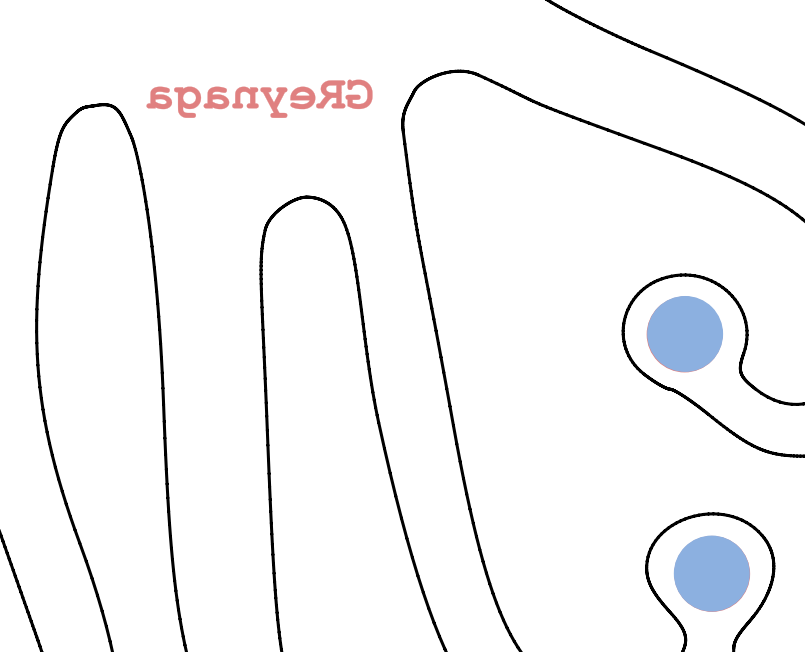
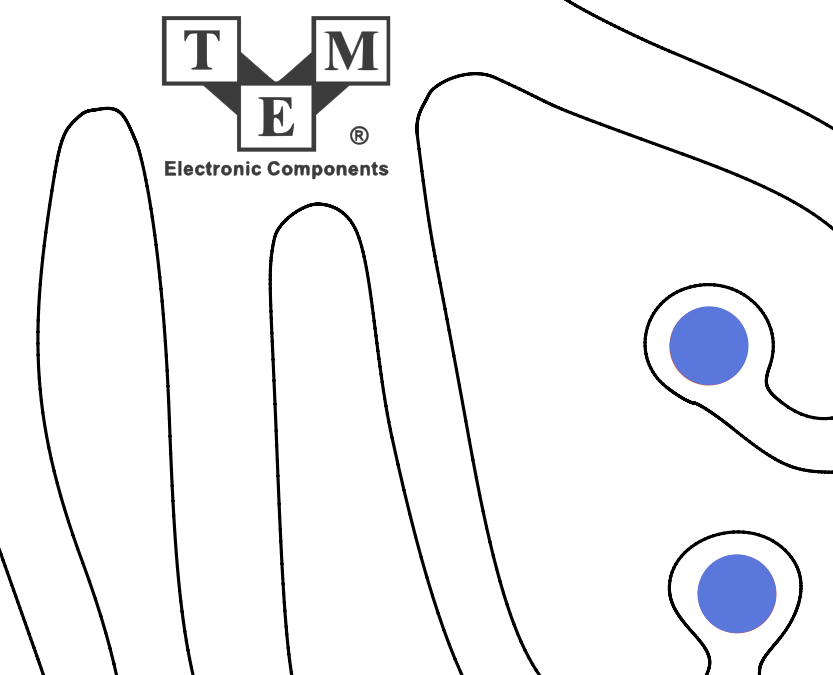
drawing shape: [146, 79, 373, 118] -> [161, 16, 391, 180]

